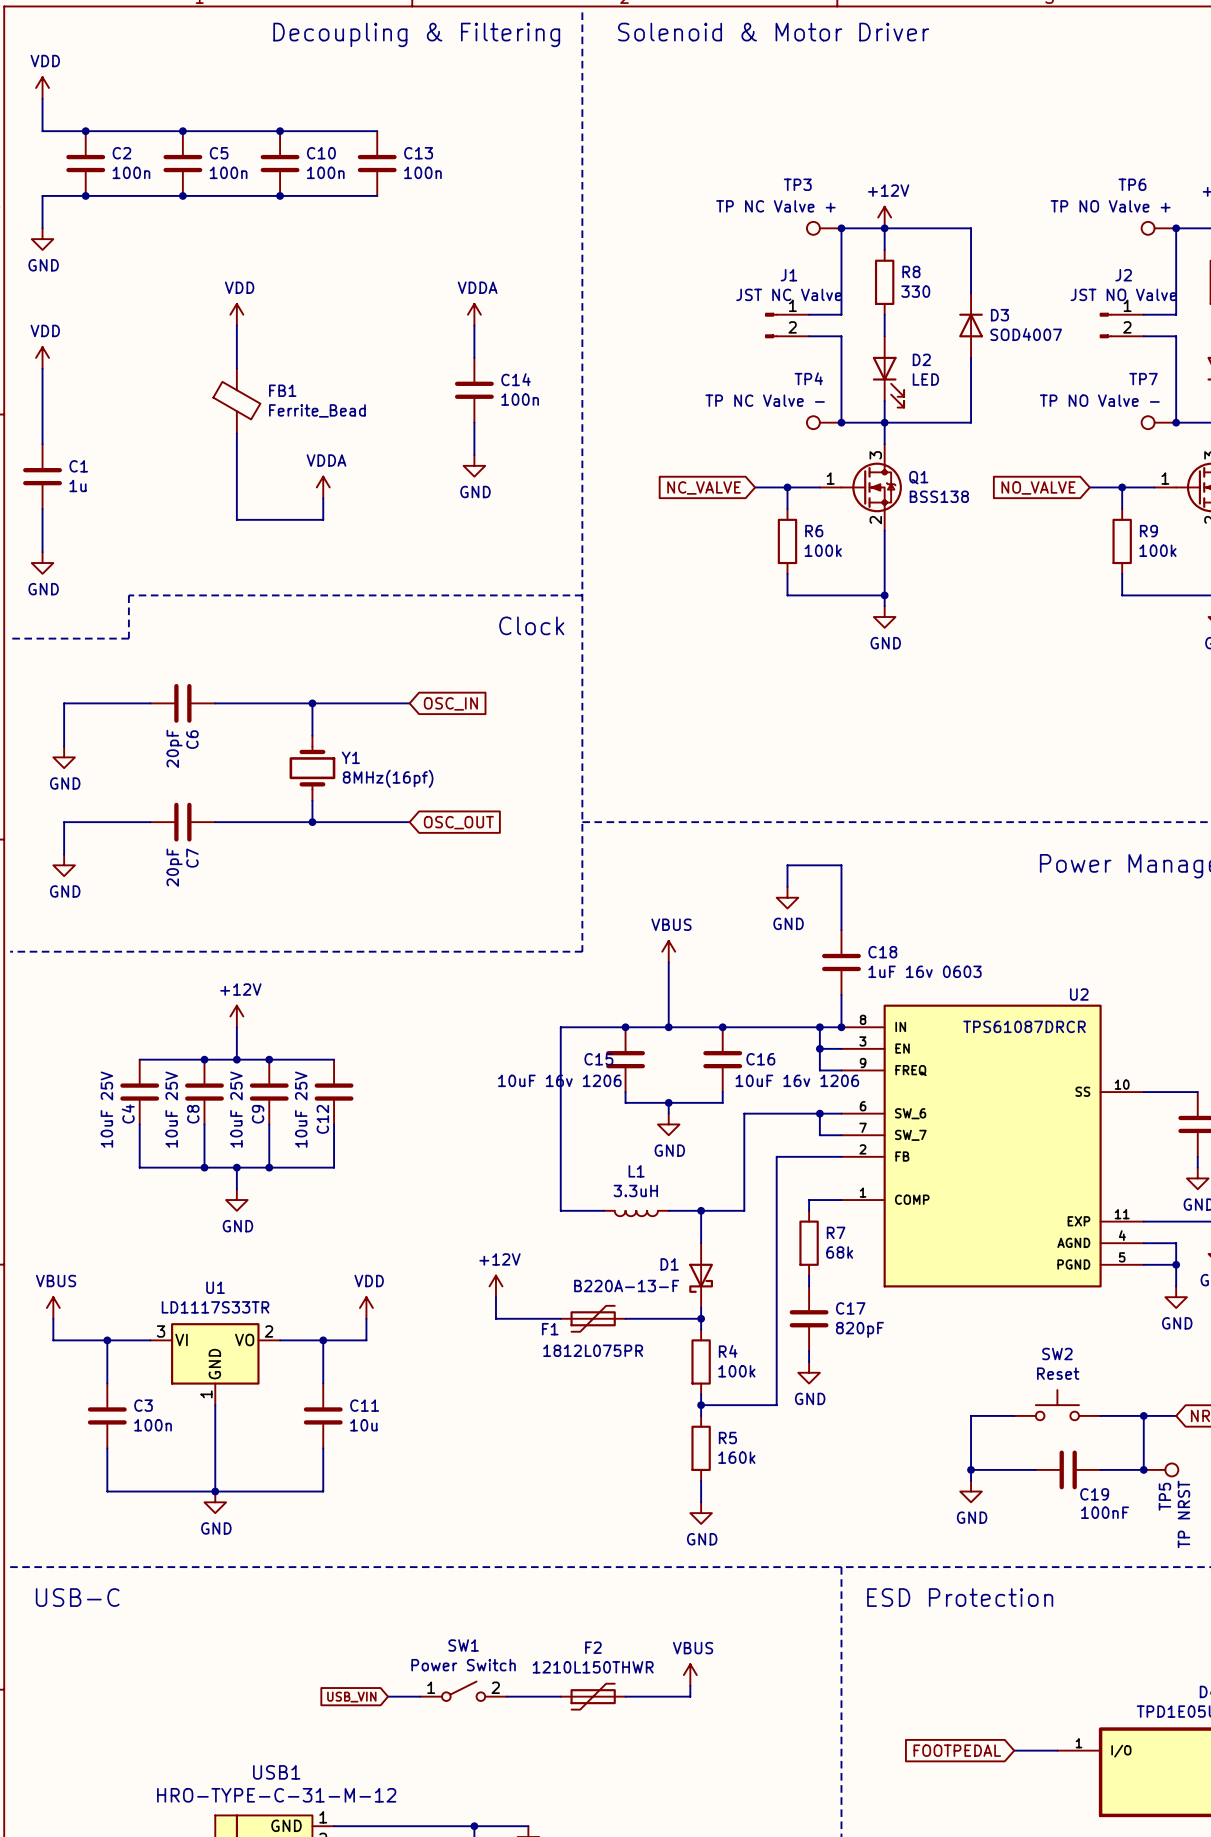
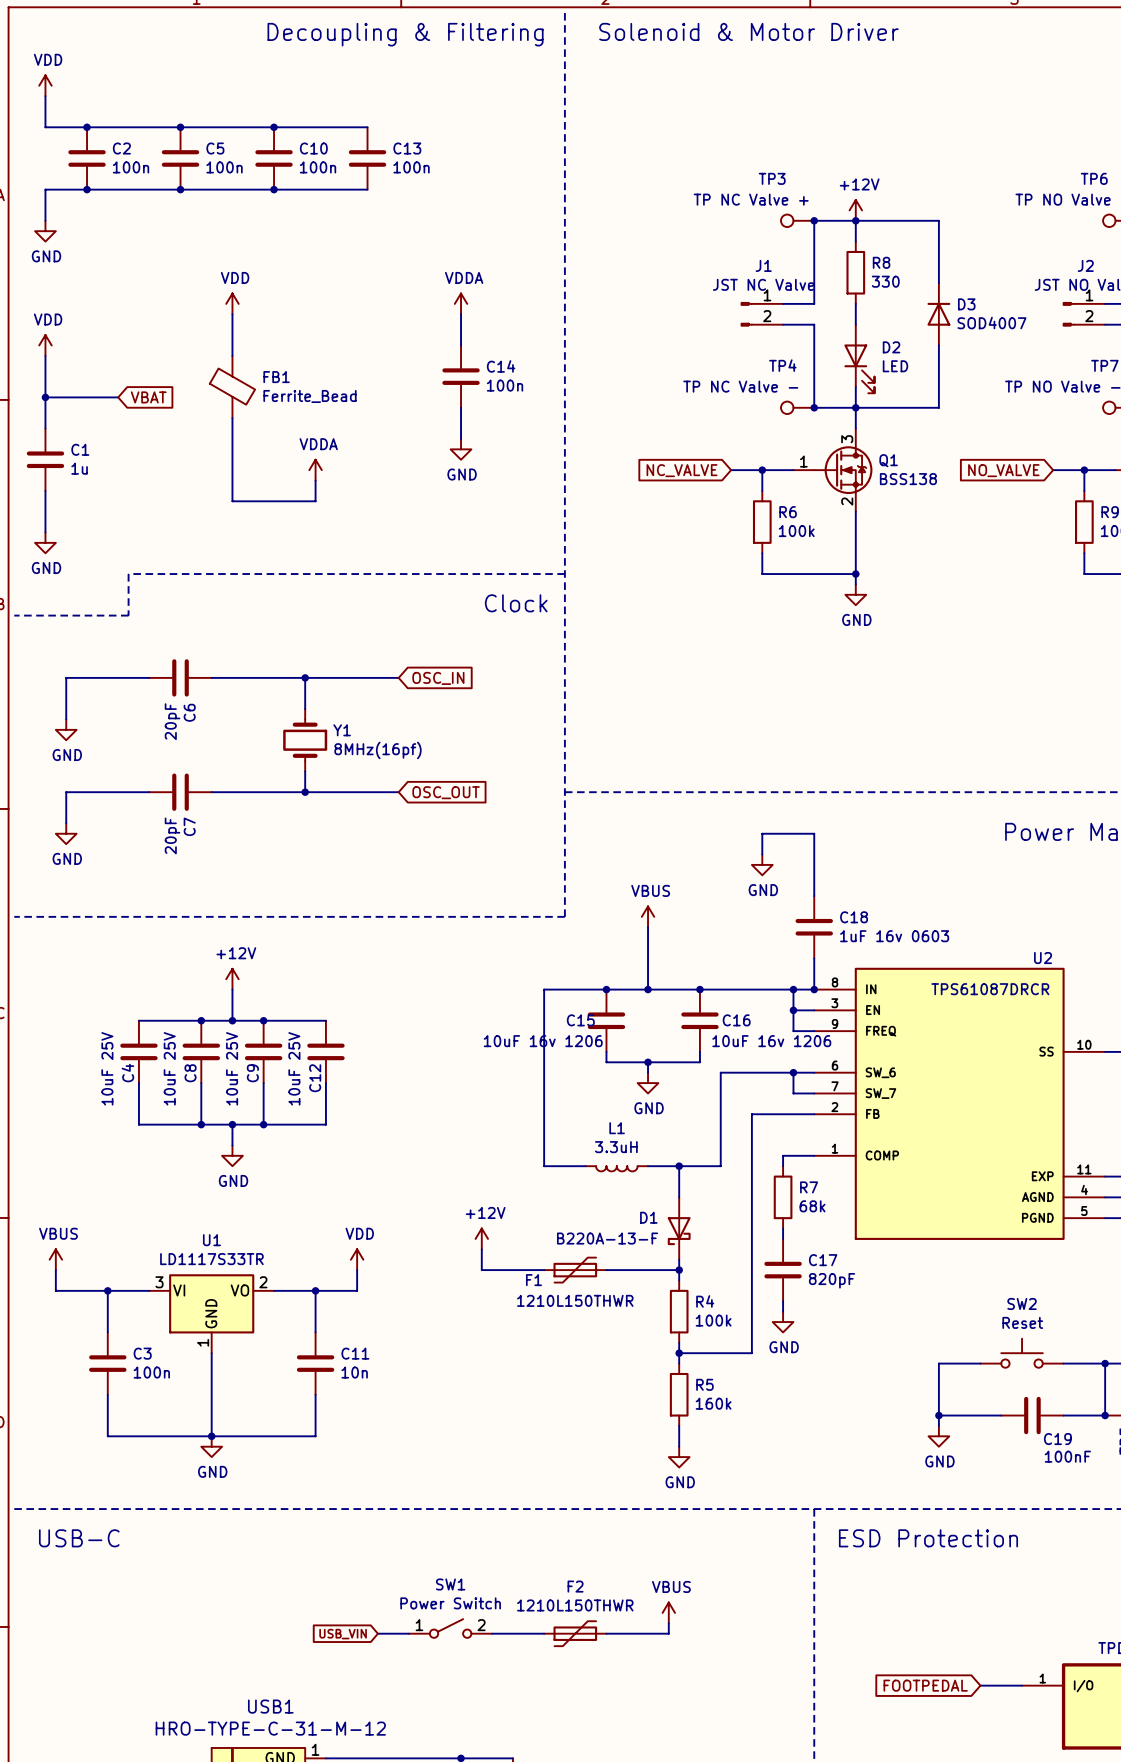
wire: none -> (45, 397) (118, 397)
junction: none -> (45, 397)
global label: none -> VBAT (148, 397)
F1 value: 1812L075PR (593, 1350) -> 1210L150THWR (575, 1300)
C11 value: 10u (363, 1425) -> 10n (354, 1372)

